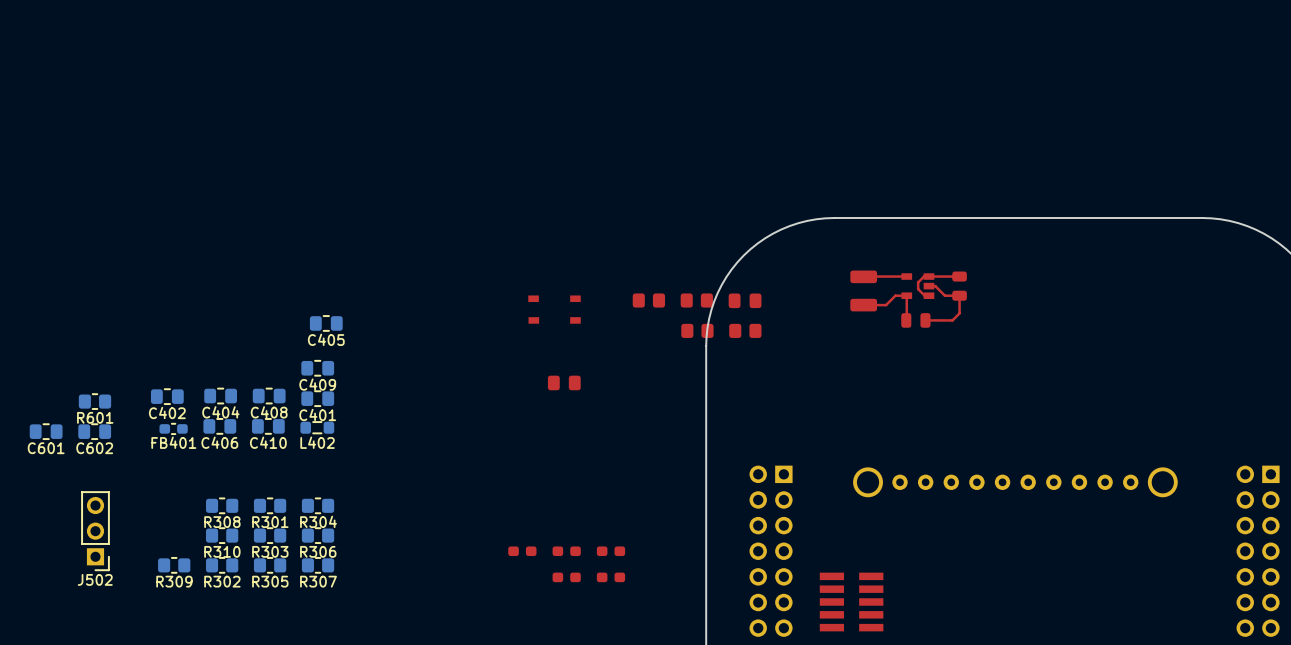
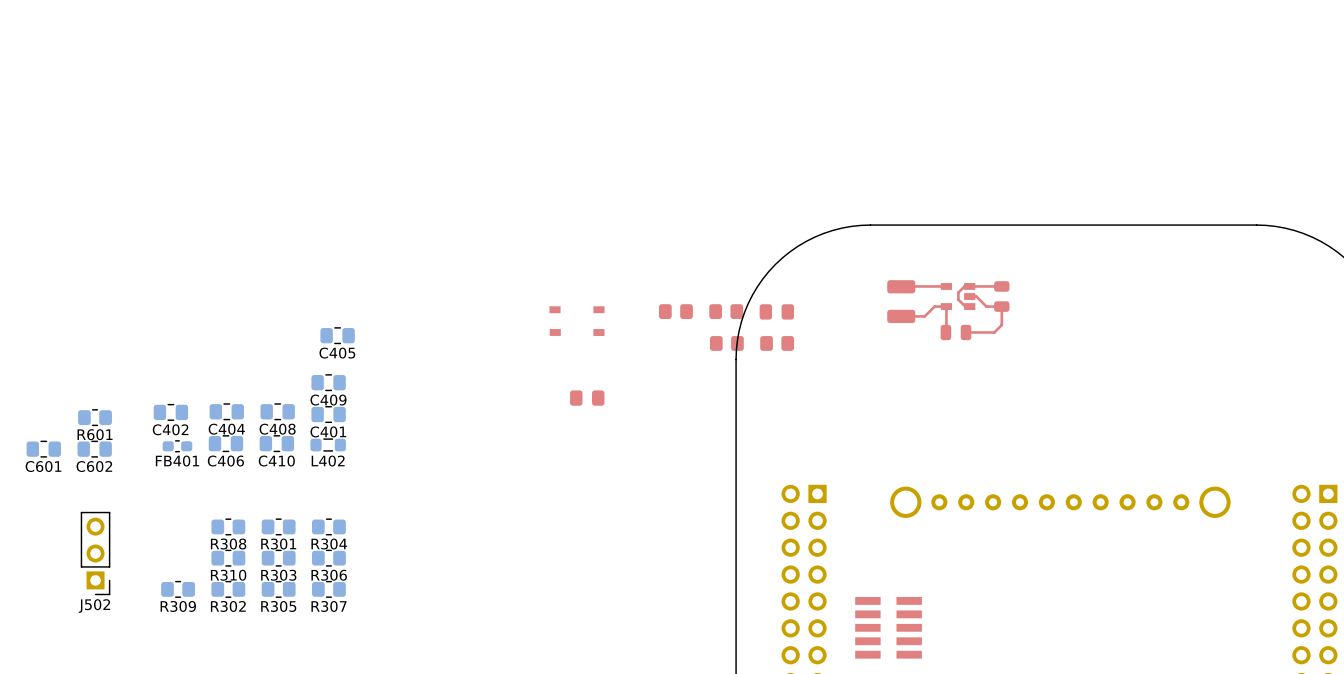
part: (522, 551) -> none
part: (566, 551) -> none
part: (610, 551) -> none
part: (566, 577) -> none
part: (610, 577) -> none

